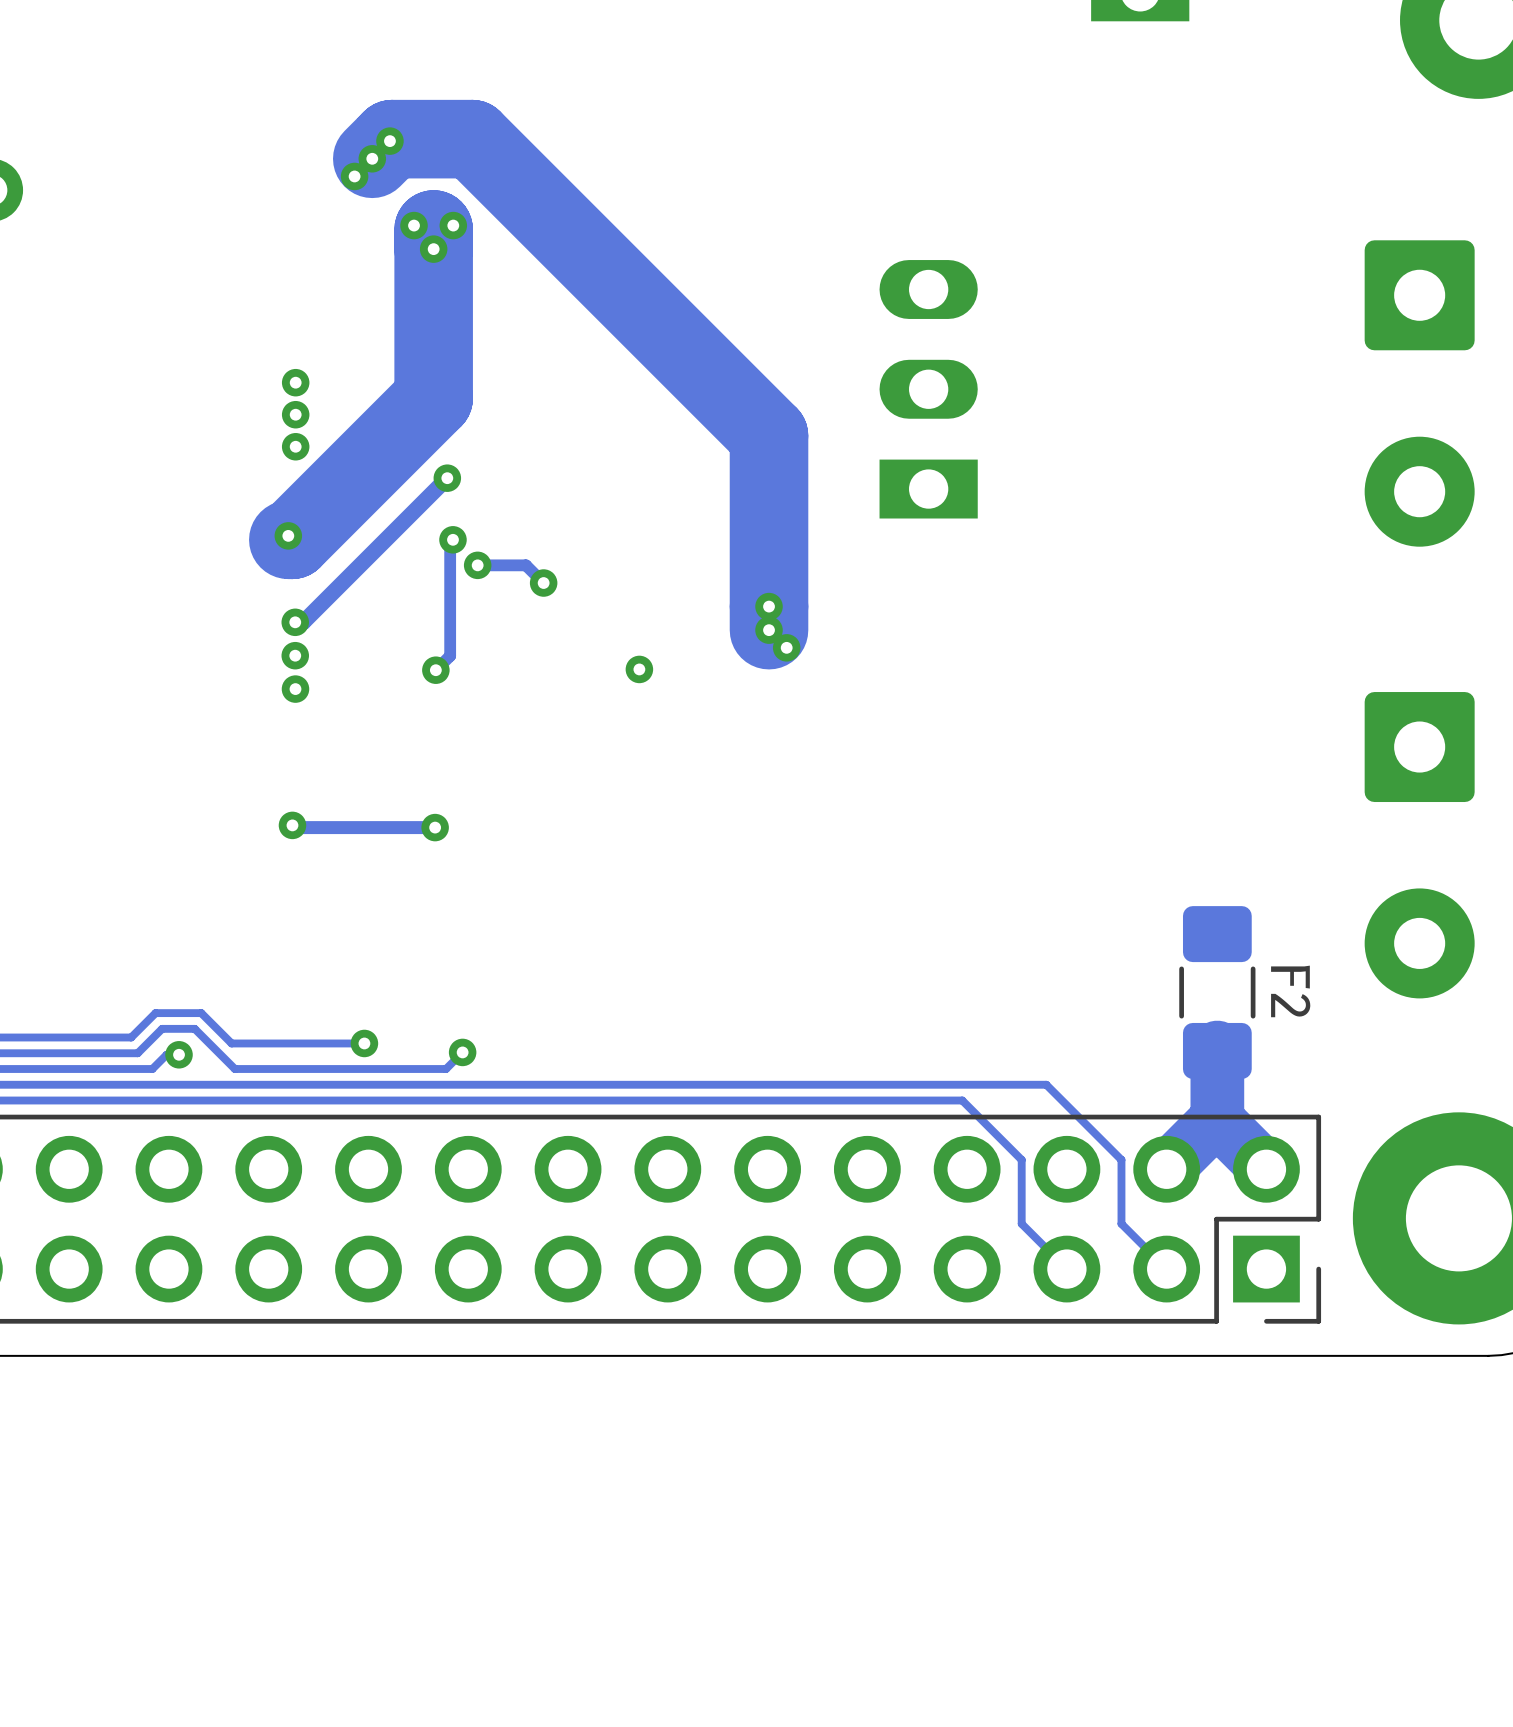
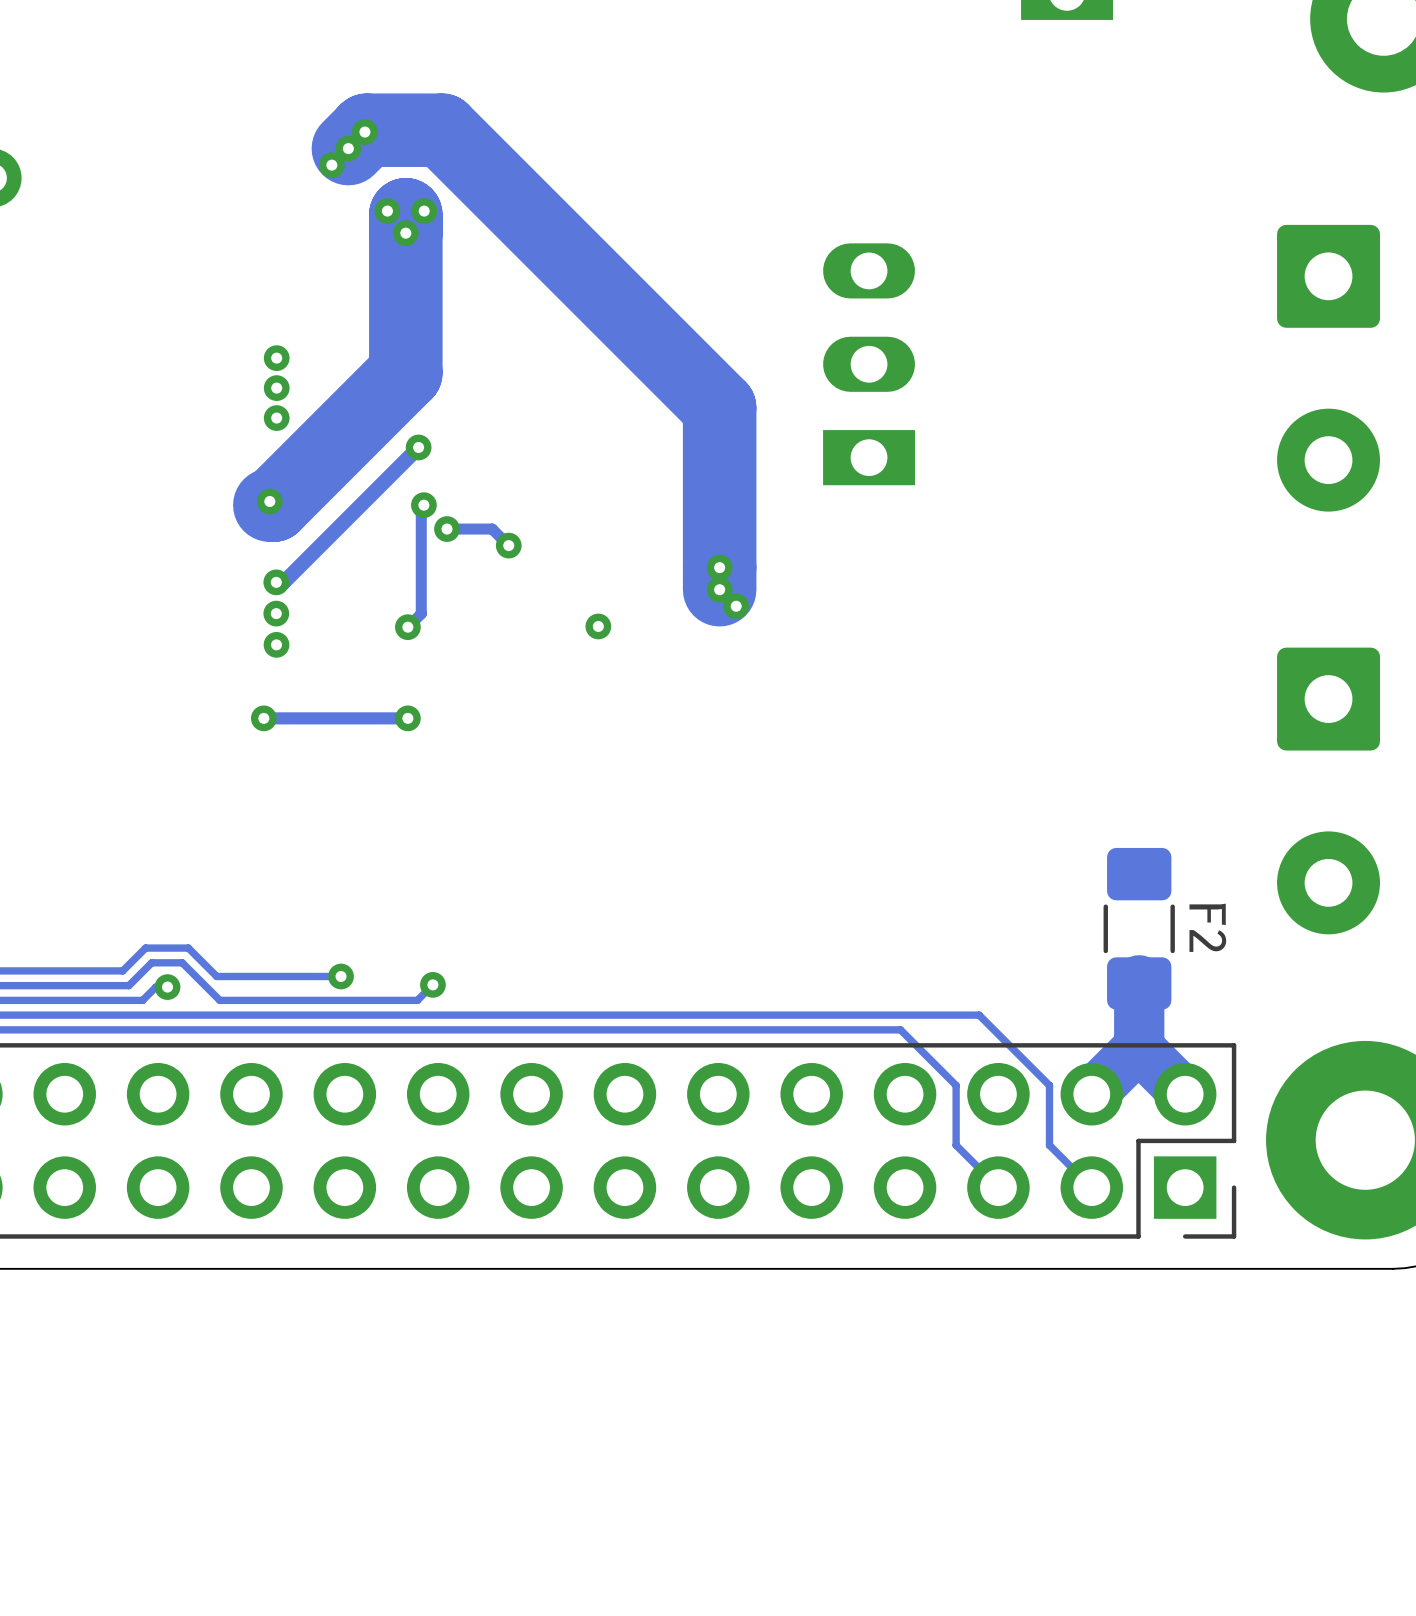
track: none -> (407, 718) (263, 718)
track: (292, 825) (294, 827) (435, 827) -> none
via position: (292, 825) -> (263, 718)
via position: (435, 827) -> (407, 718)

